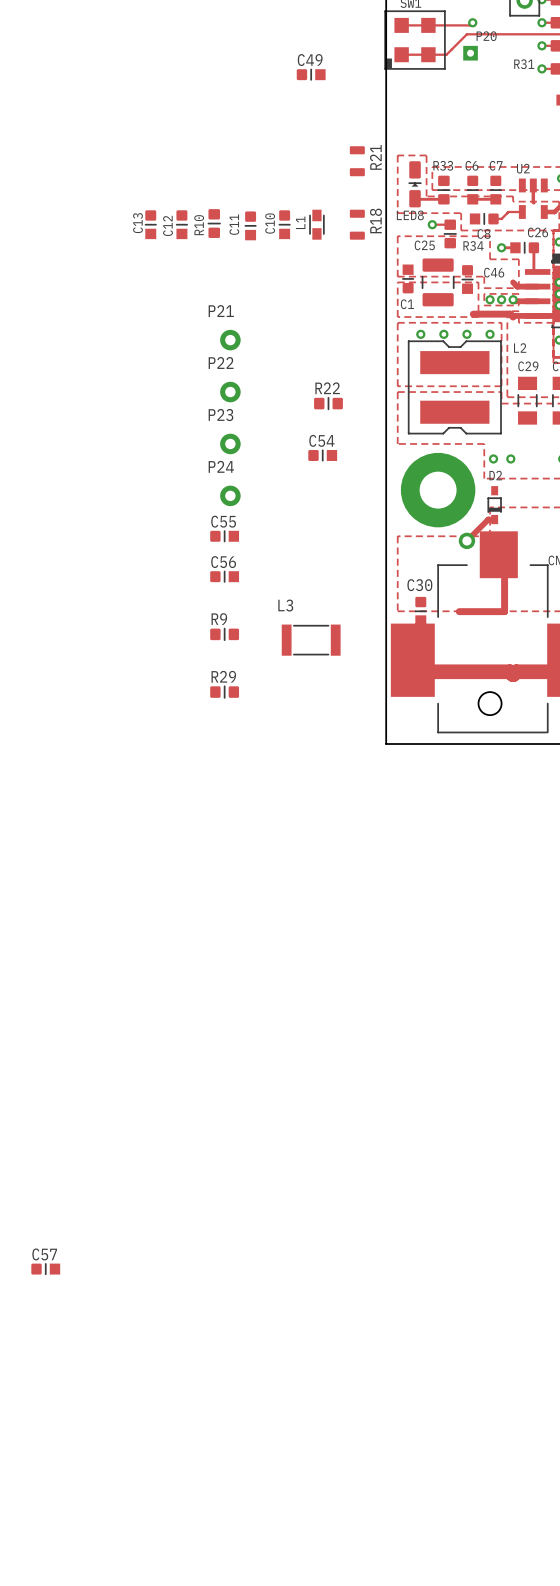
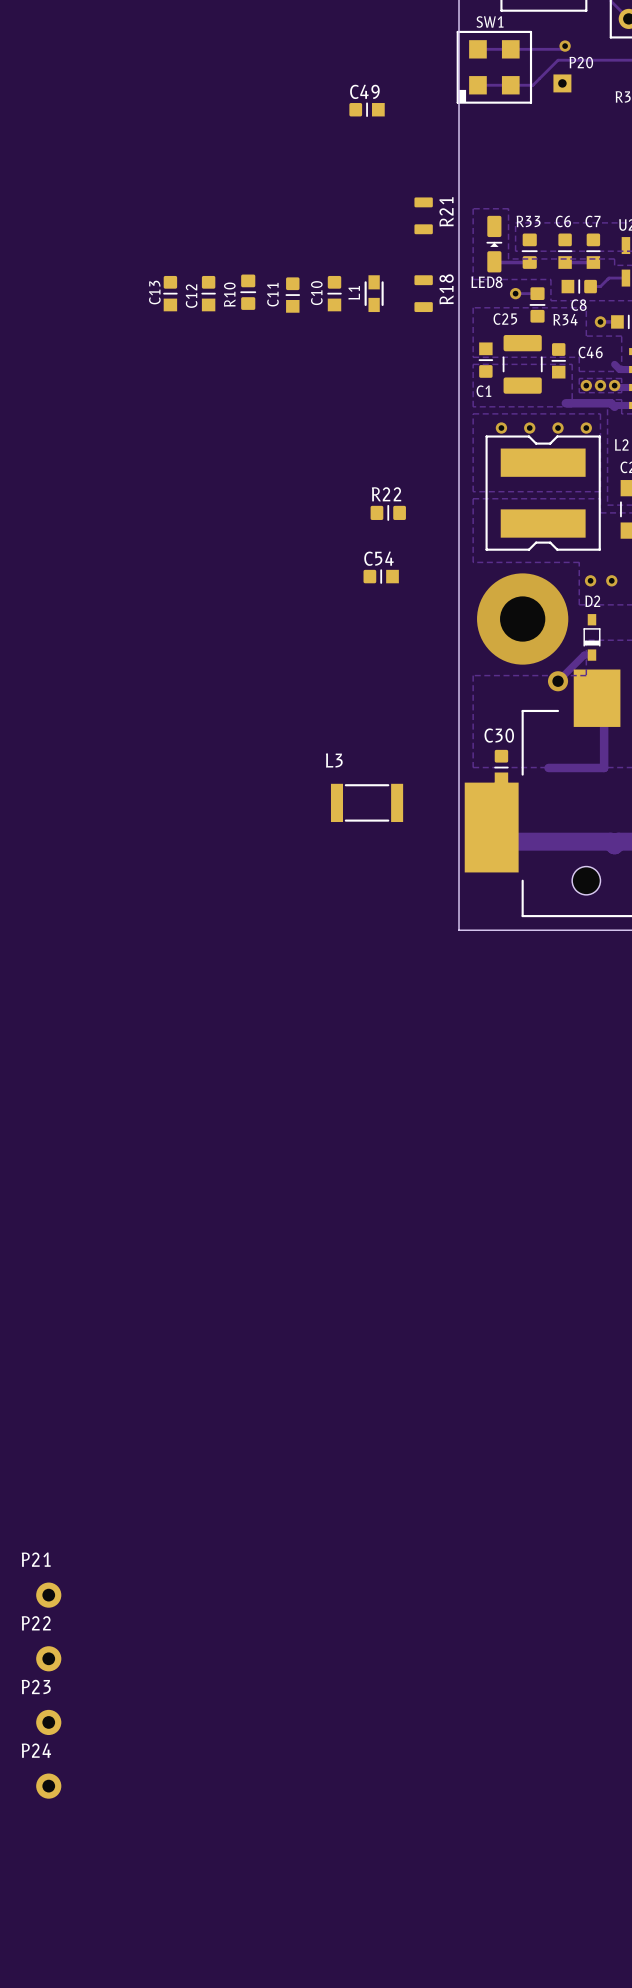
P21 position: (230, 340) -> (48, 1595)
P22 position: (230, 392) -> (48, 1658)
P23 position: (230, 443) -> (48, 1722)
P24 position: (230, 495) -> (48, 1786)
C55: (224, 536) -> none
C56: (224, 576) -> none
R9: (224, 634) -> none
R29: (224, 692) -> none
C57: (45, 1269) -> none

